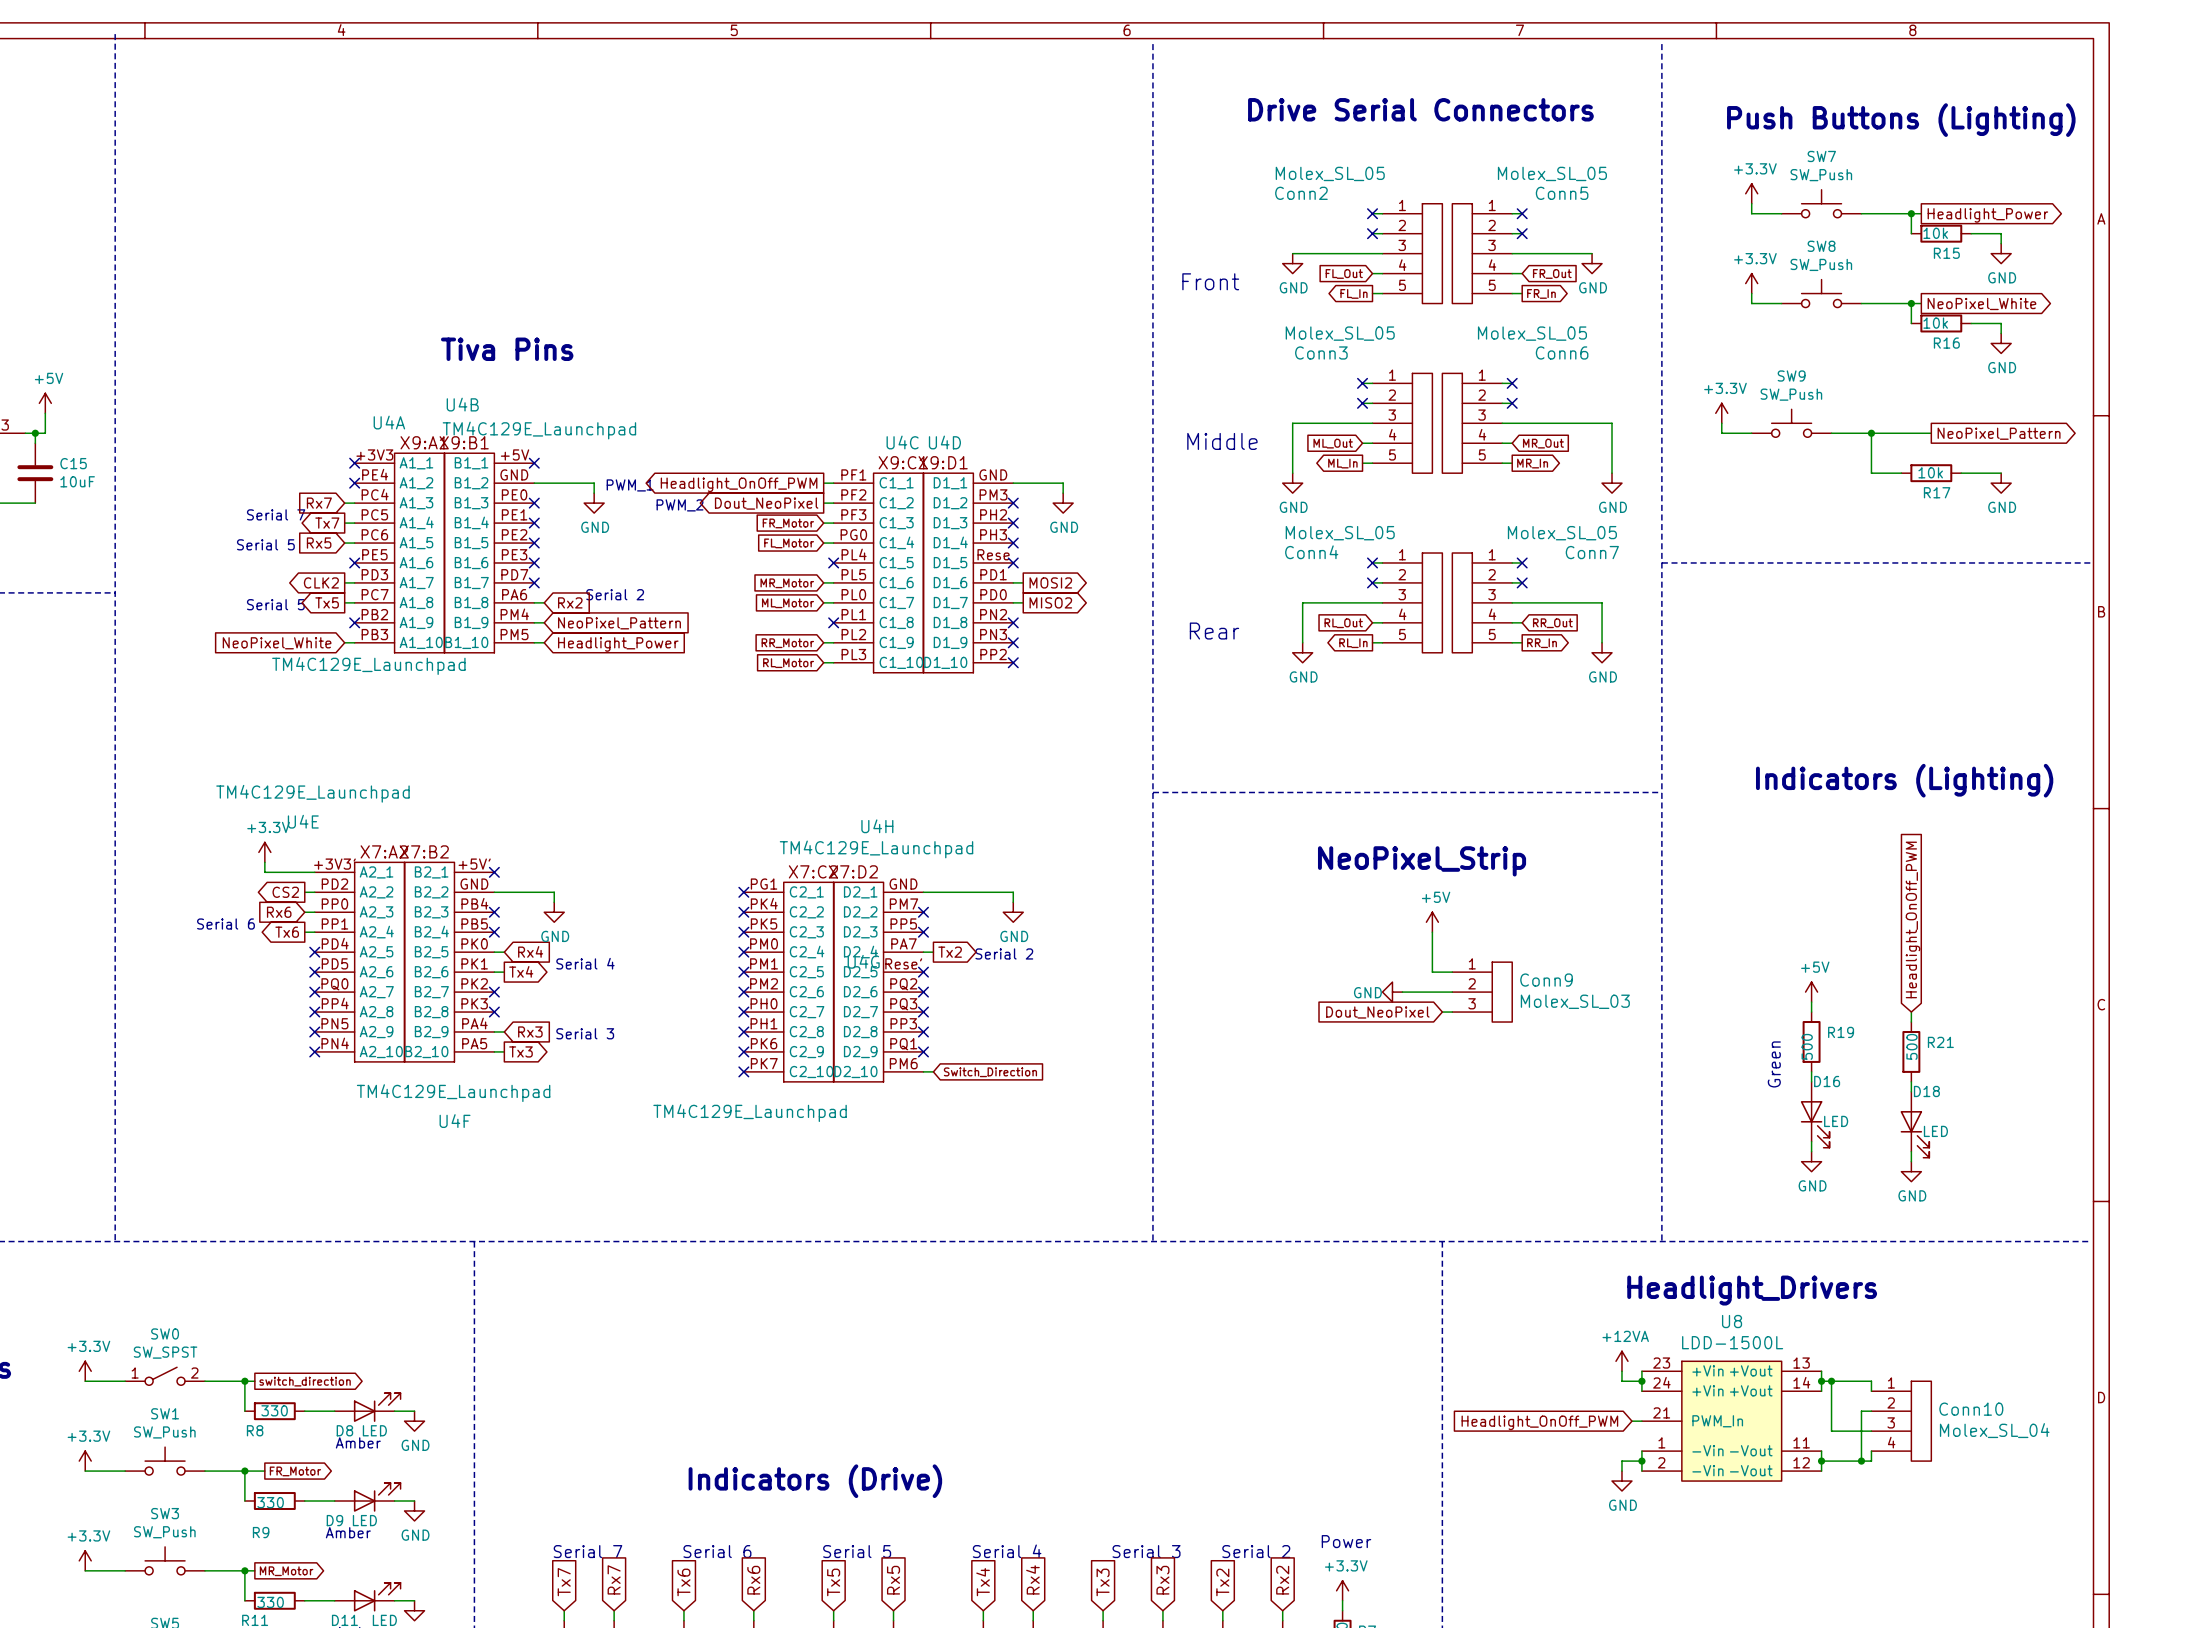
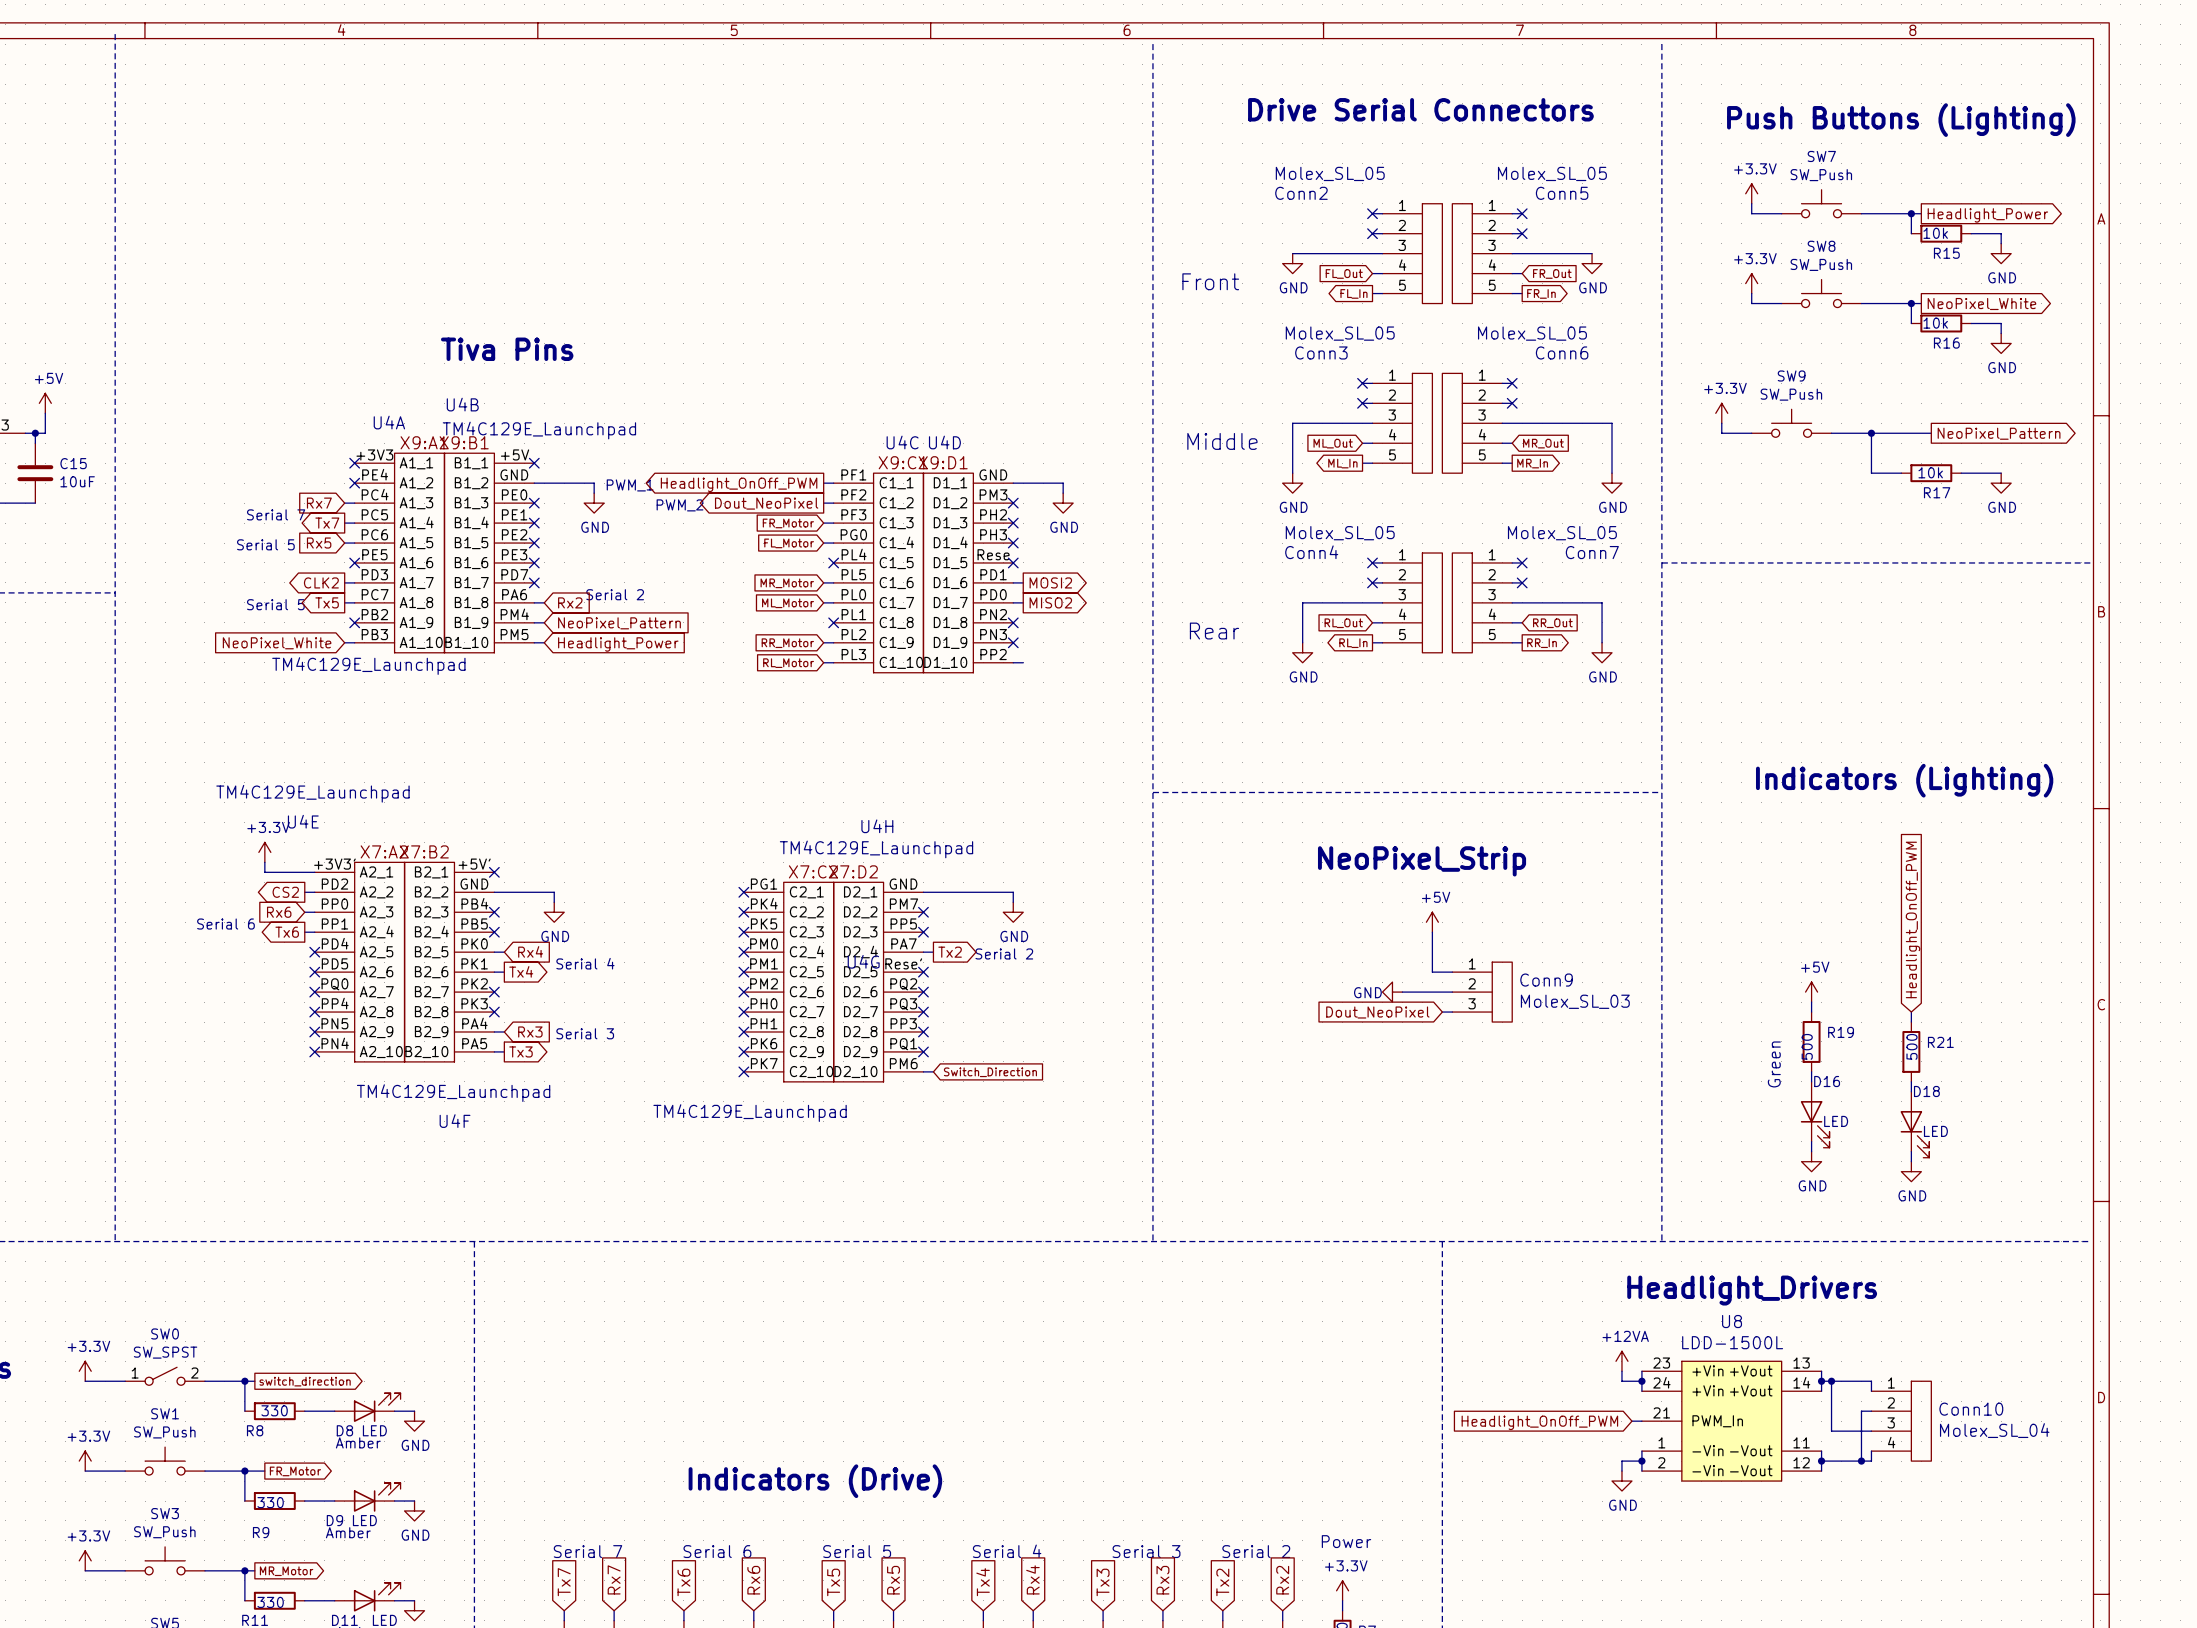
wire: none -> (1013, 662) (1023, 662)
no-connect mark: (1013, 662) -> none

